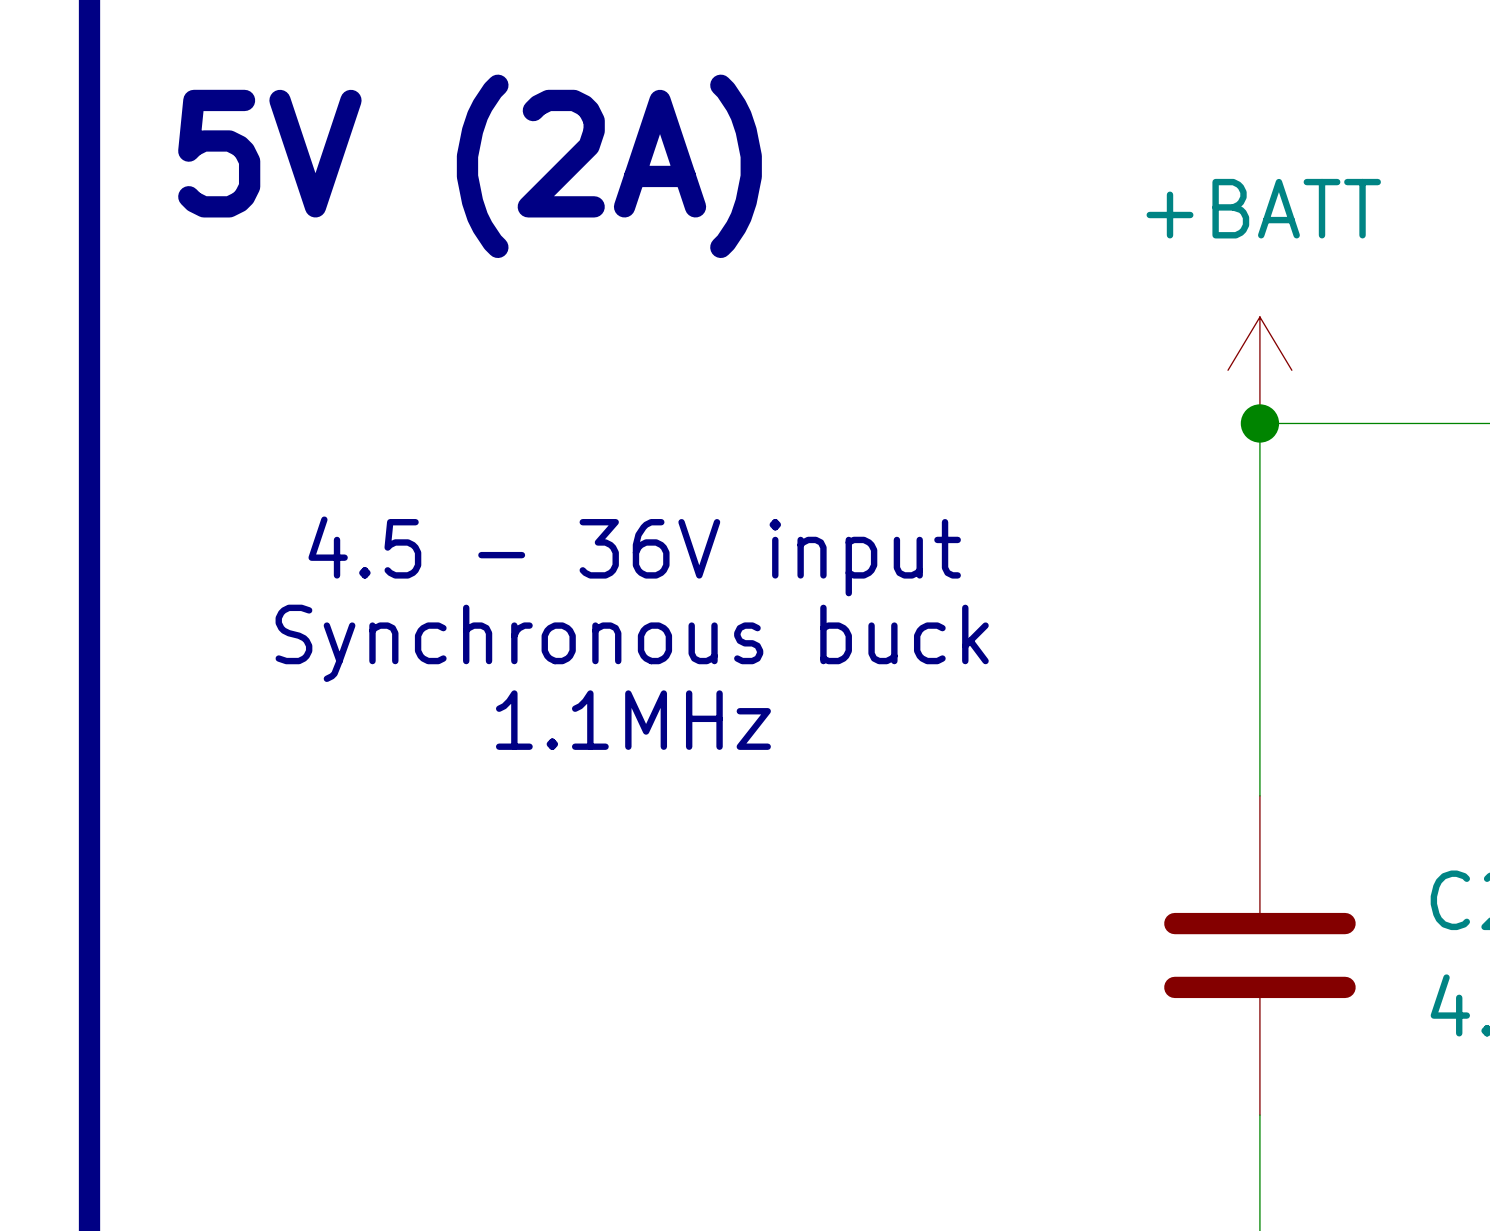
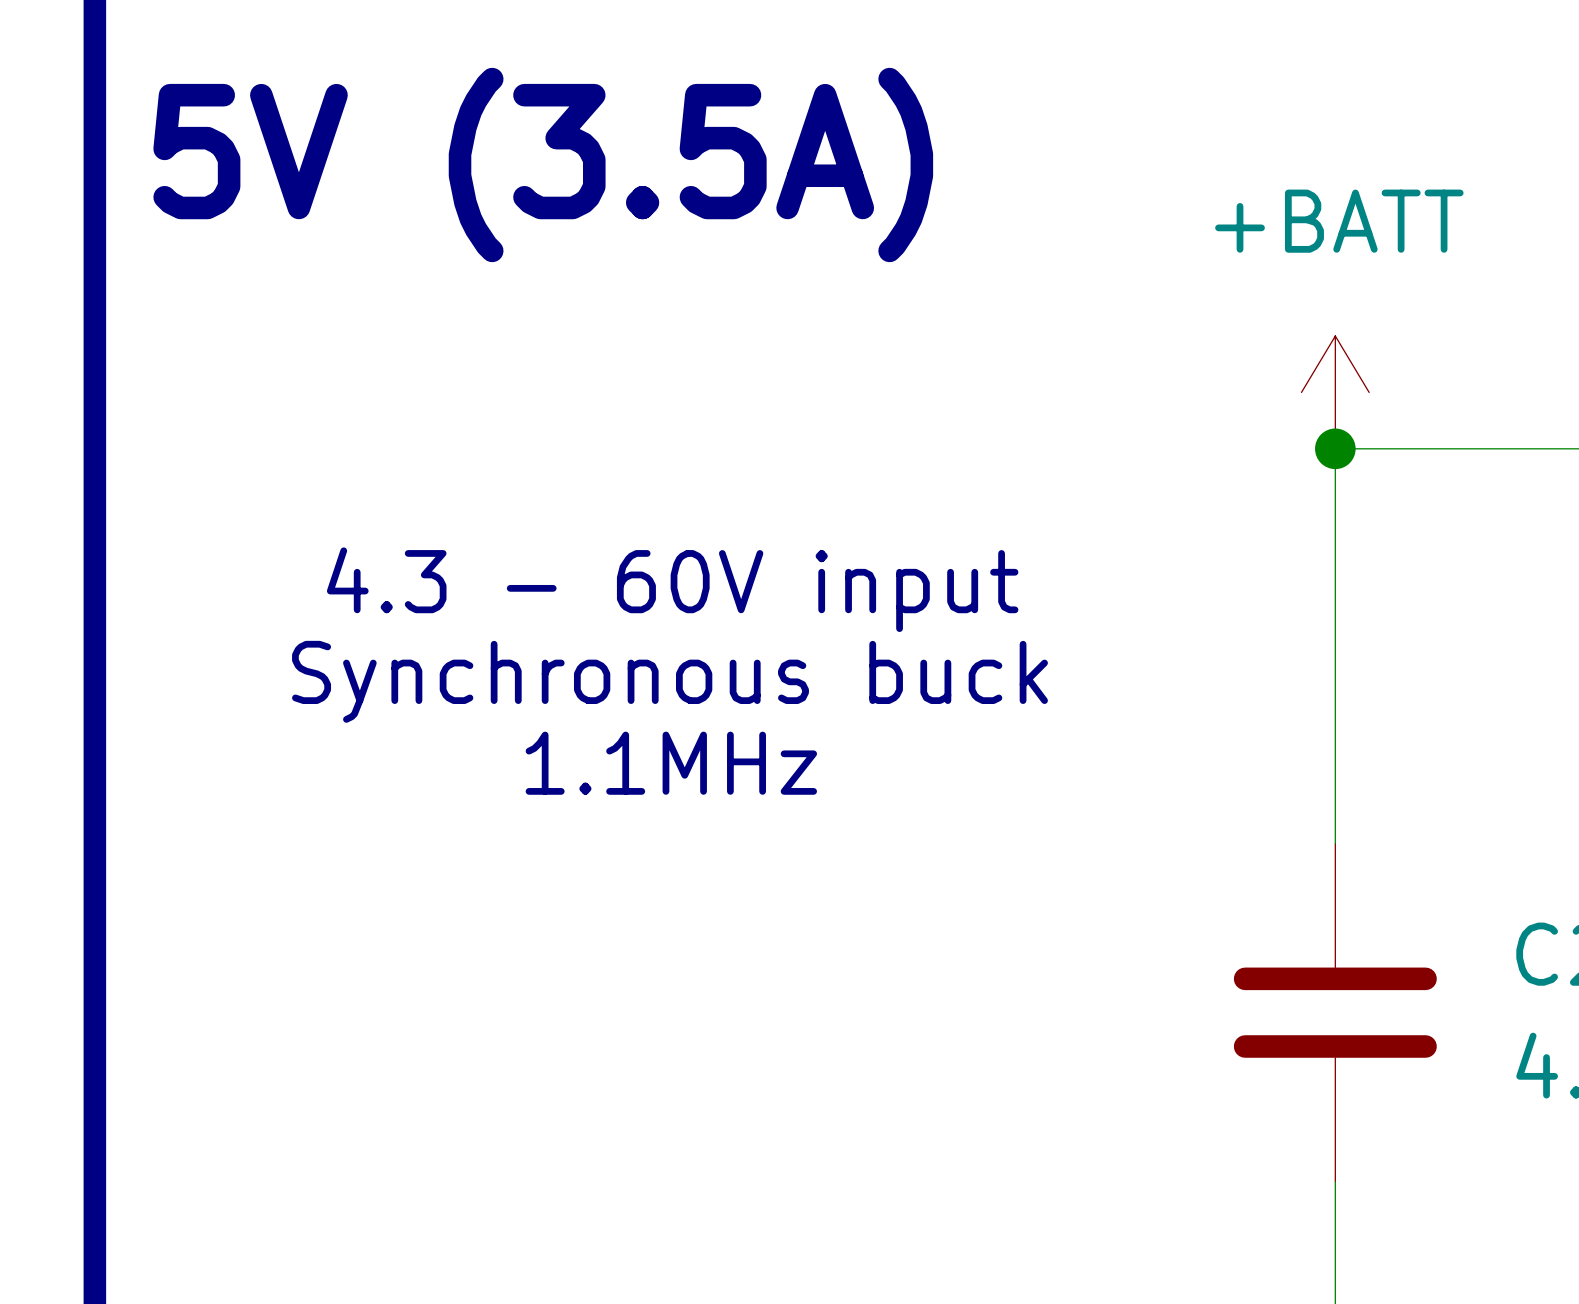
text: 5V (2A) (470, 166) -> 5V (3.5A) (543, 165)
text: 4.5 - 36V input (634, 556) -> 4.3 - 60V input (672, 589)

